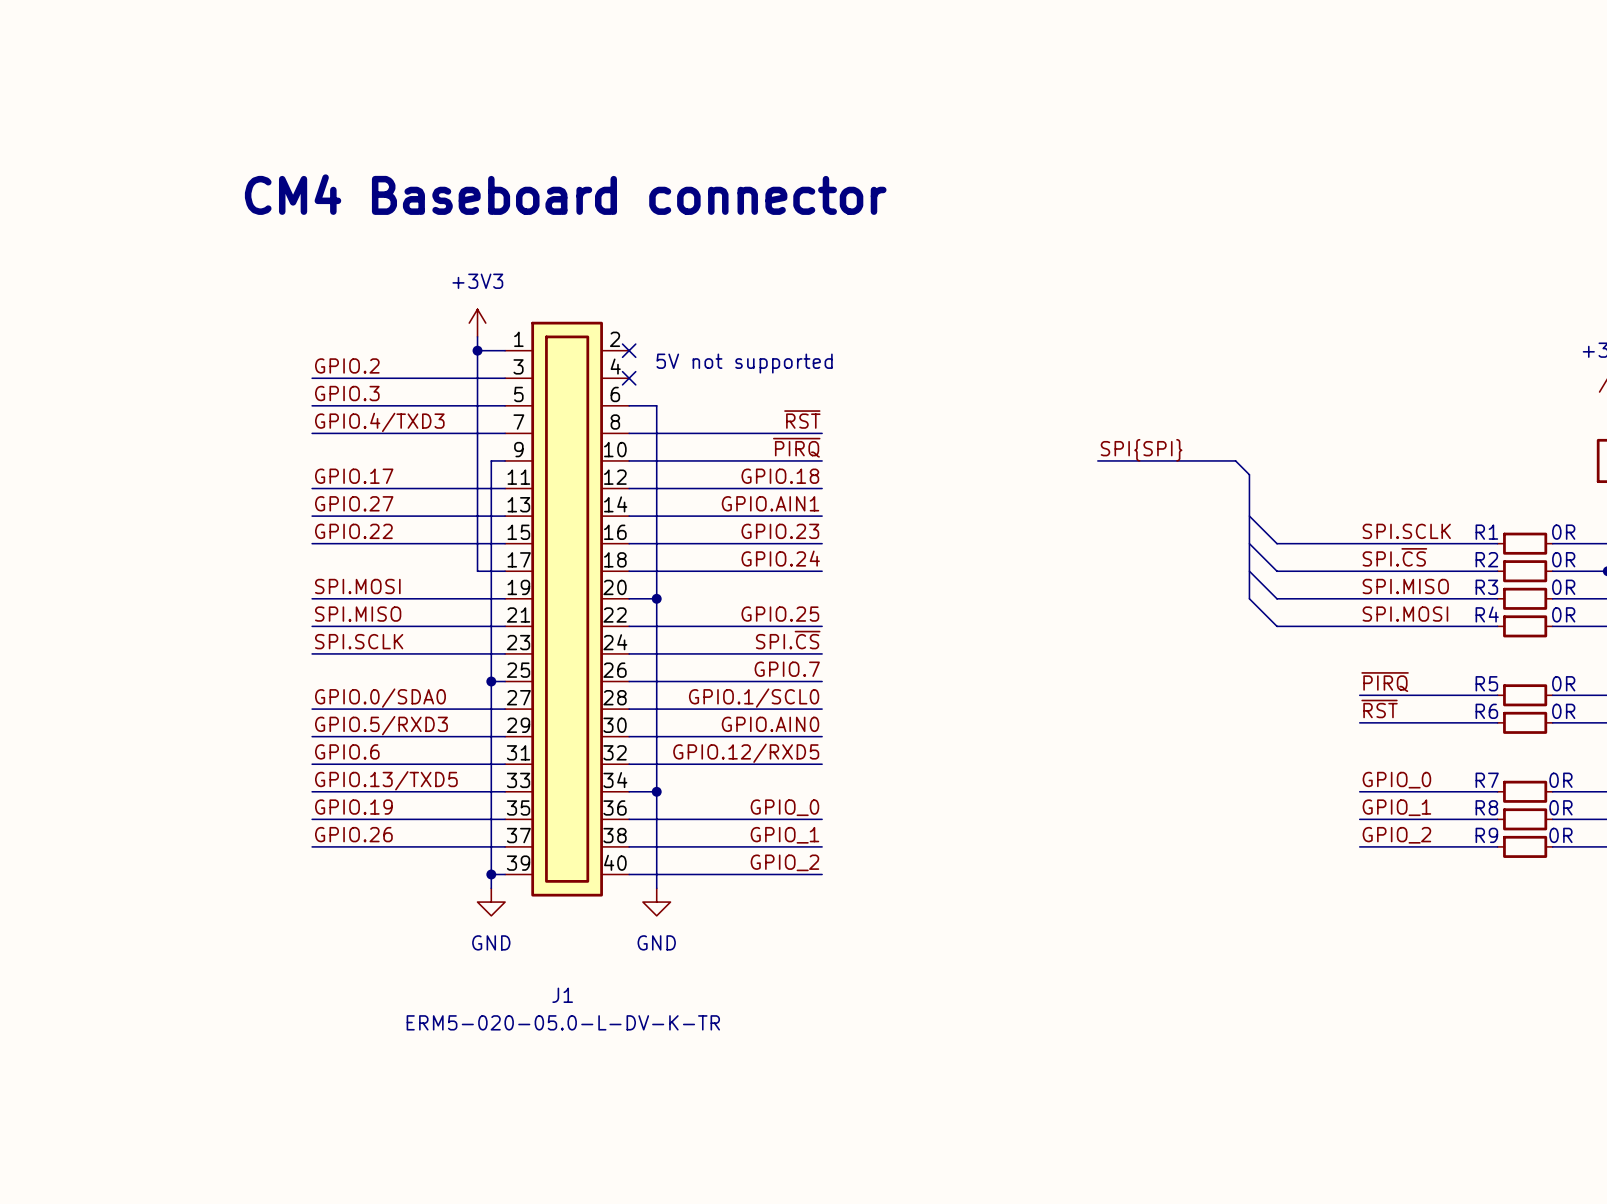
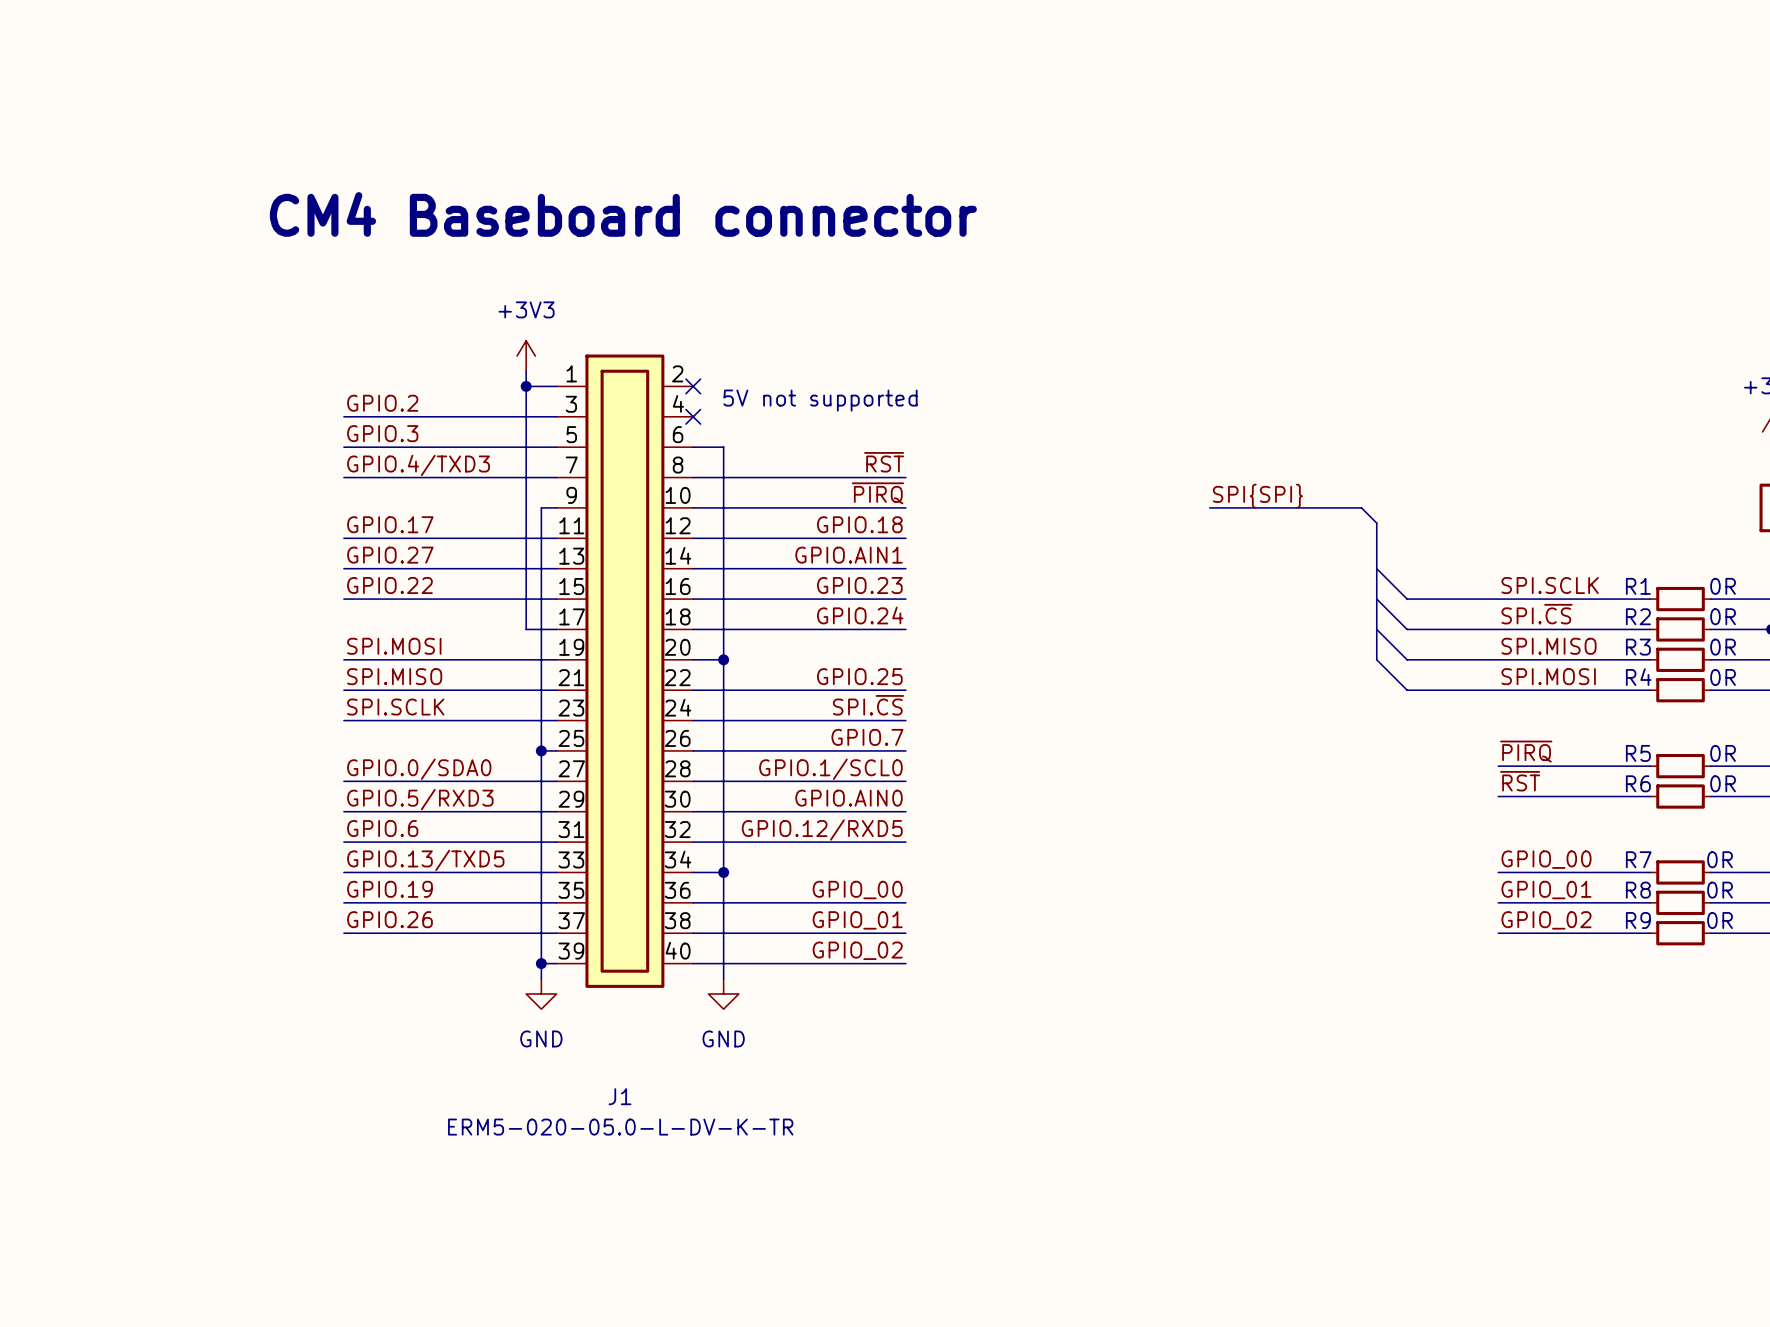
label: GPIO_0 (1396, 780) -> GPIO_00 (1546, 859)
label: GPIO_0 (784, 807) -> GPIO_00 (857, 890)
label: GPIO_1 (1396, 807) -> GPIO_01 (1546, 890)
label: GPIO_1 (784, 835) -> GPIO_01 (857, 920)
label: GPIO_2 (1396, 835) -> GPIO_02 (1546, 920)
label: GPIO_2 (784, 862) -> GPIO_02 (857, 950)

